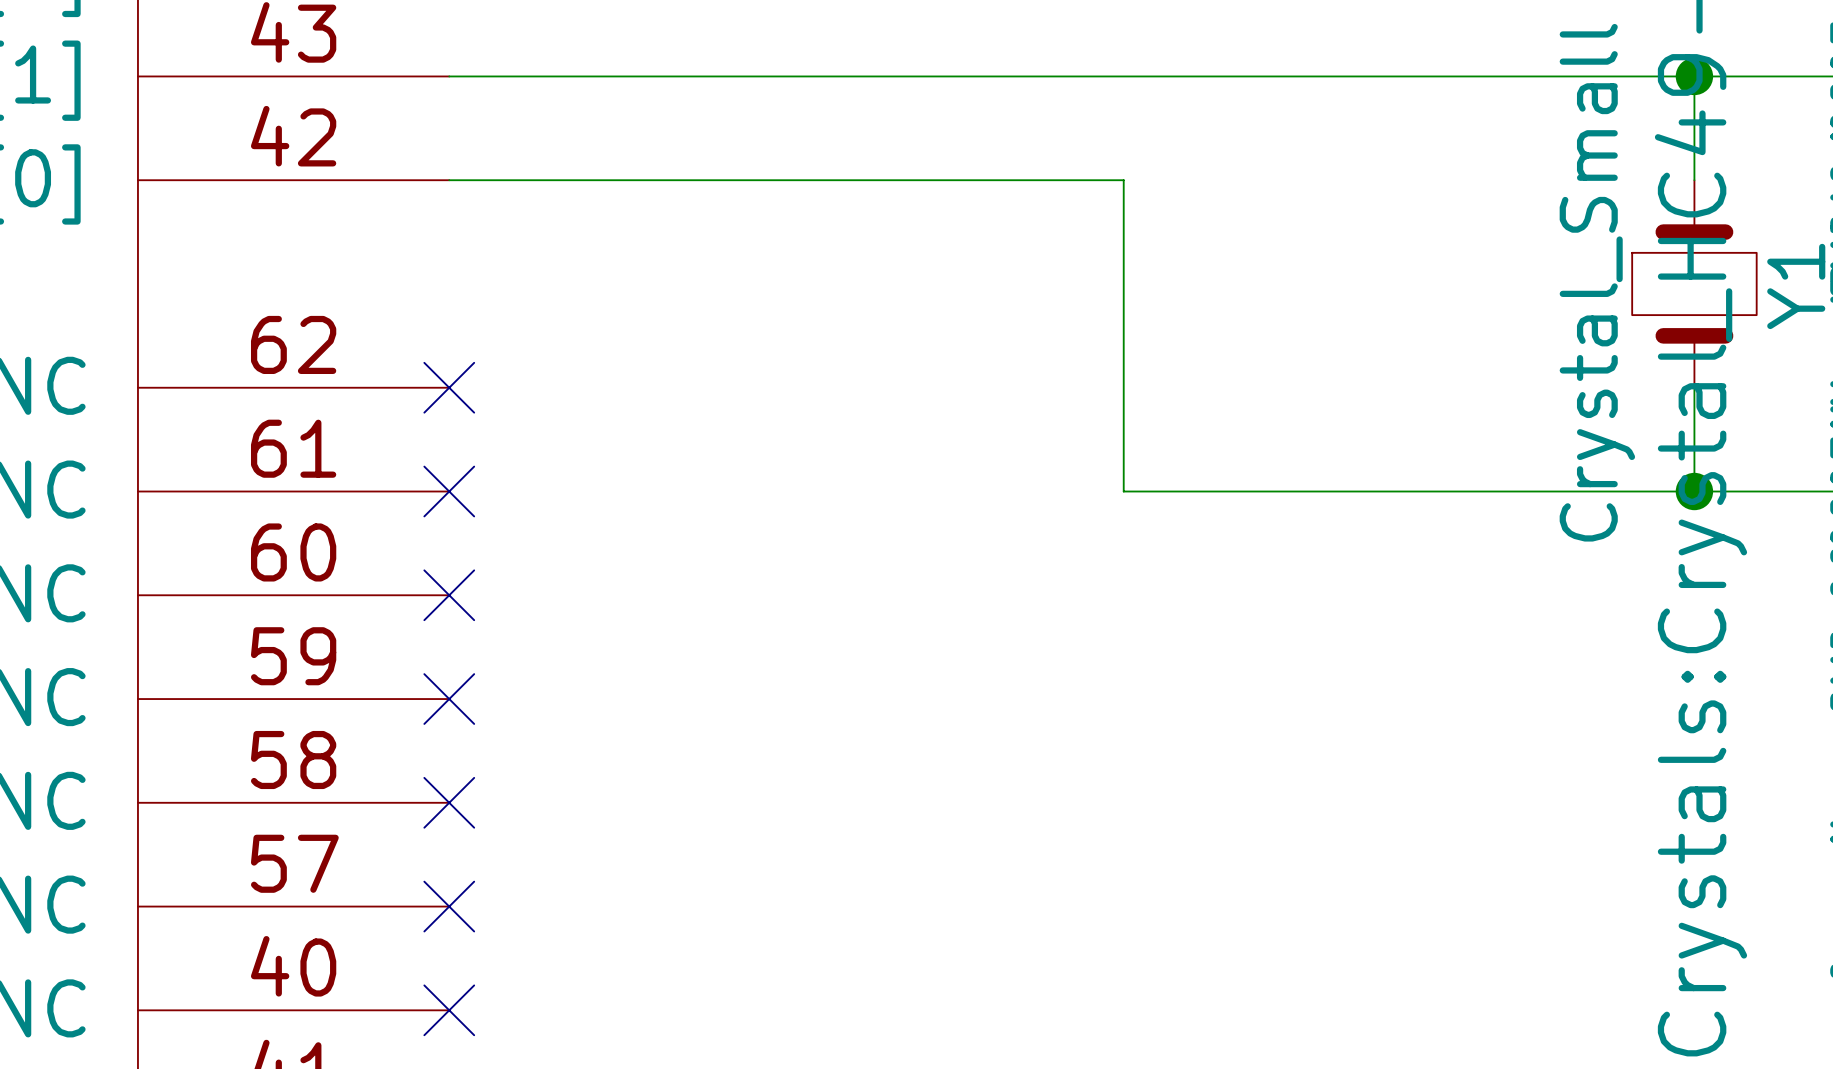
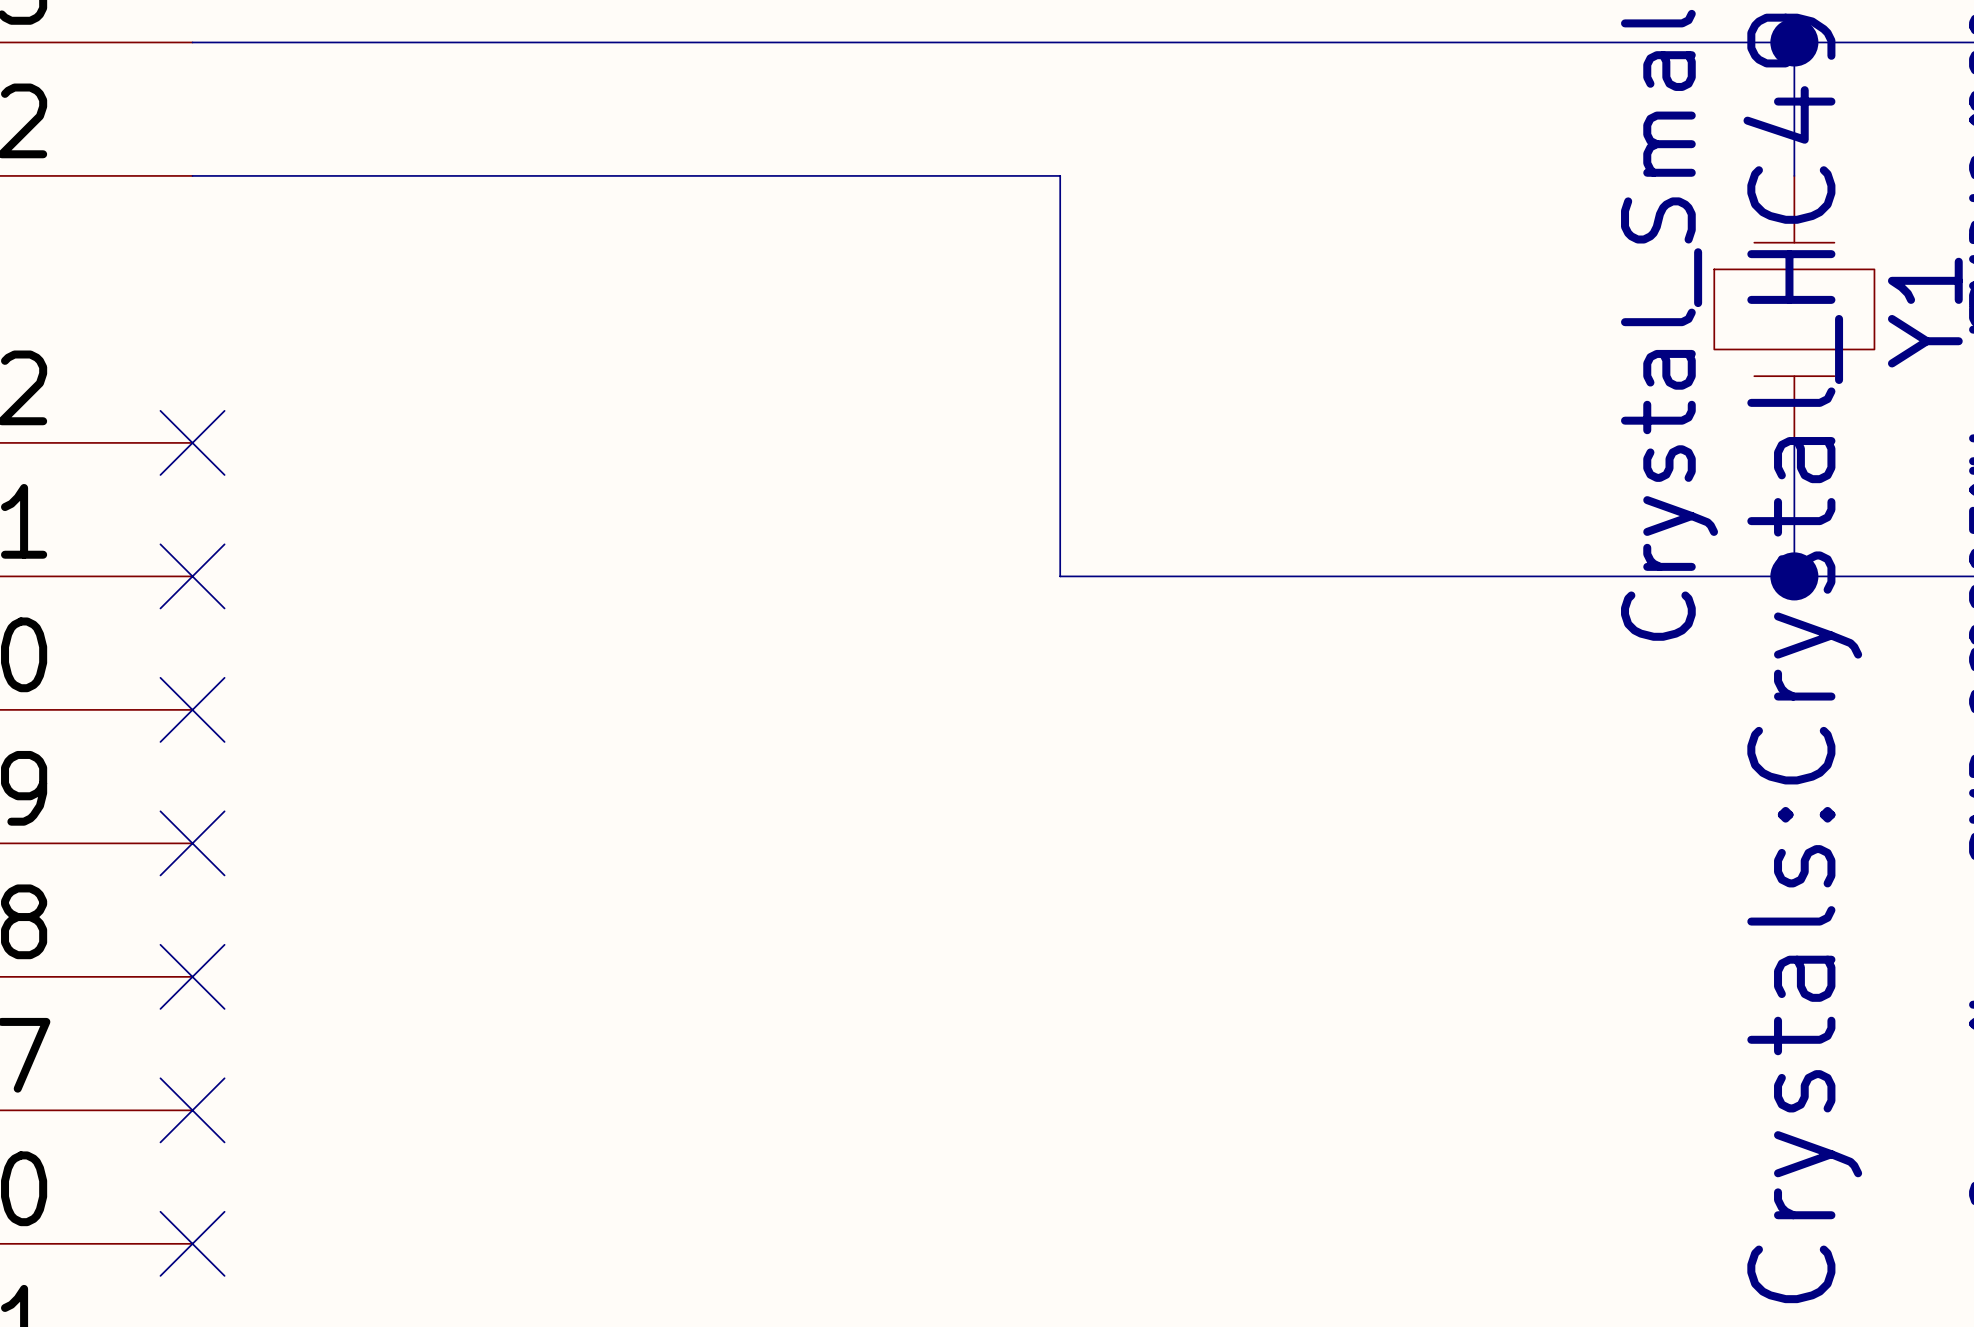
Y1 symbol: [1632, 180, 1757, 388] -> [1714, 175, 1875, 443]

